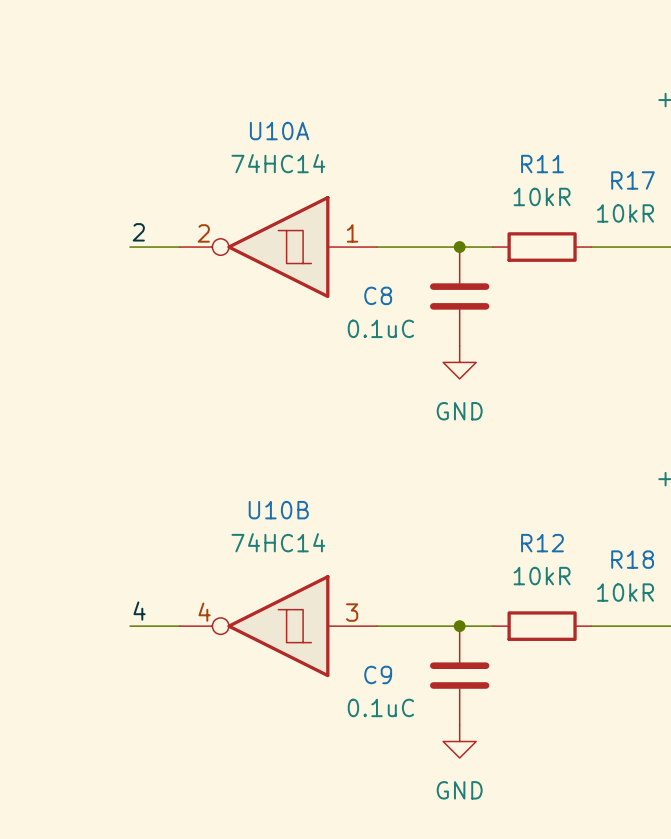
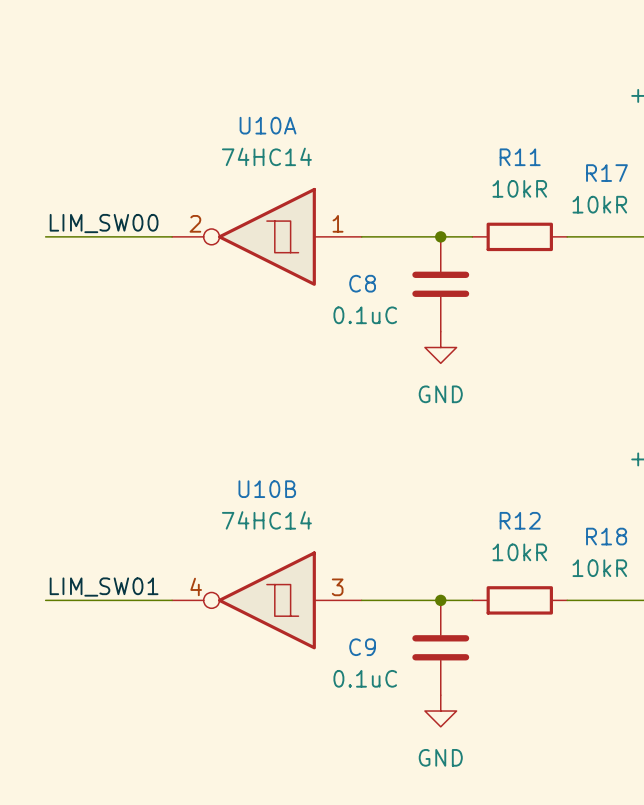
label: 2 (138, 232) -> none
label: none -> LIM_SW00 (104, 223)
wire: none -> (45, 236) (124, 236)
label: 4 (139, 611) -> none
label: none -> LIM_SW01 (104, 587)
wire: none -> (45, 600) (124, 600)

